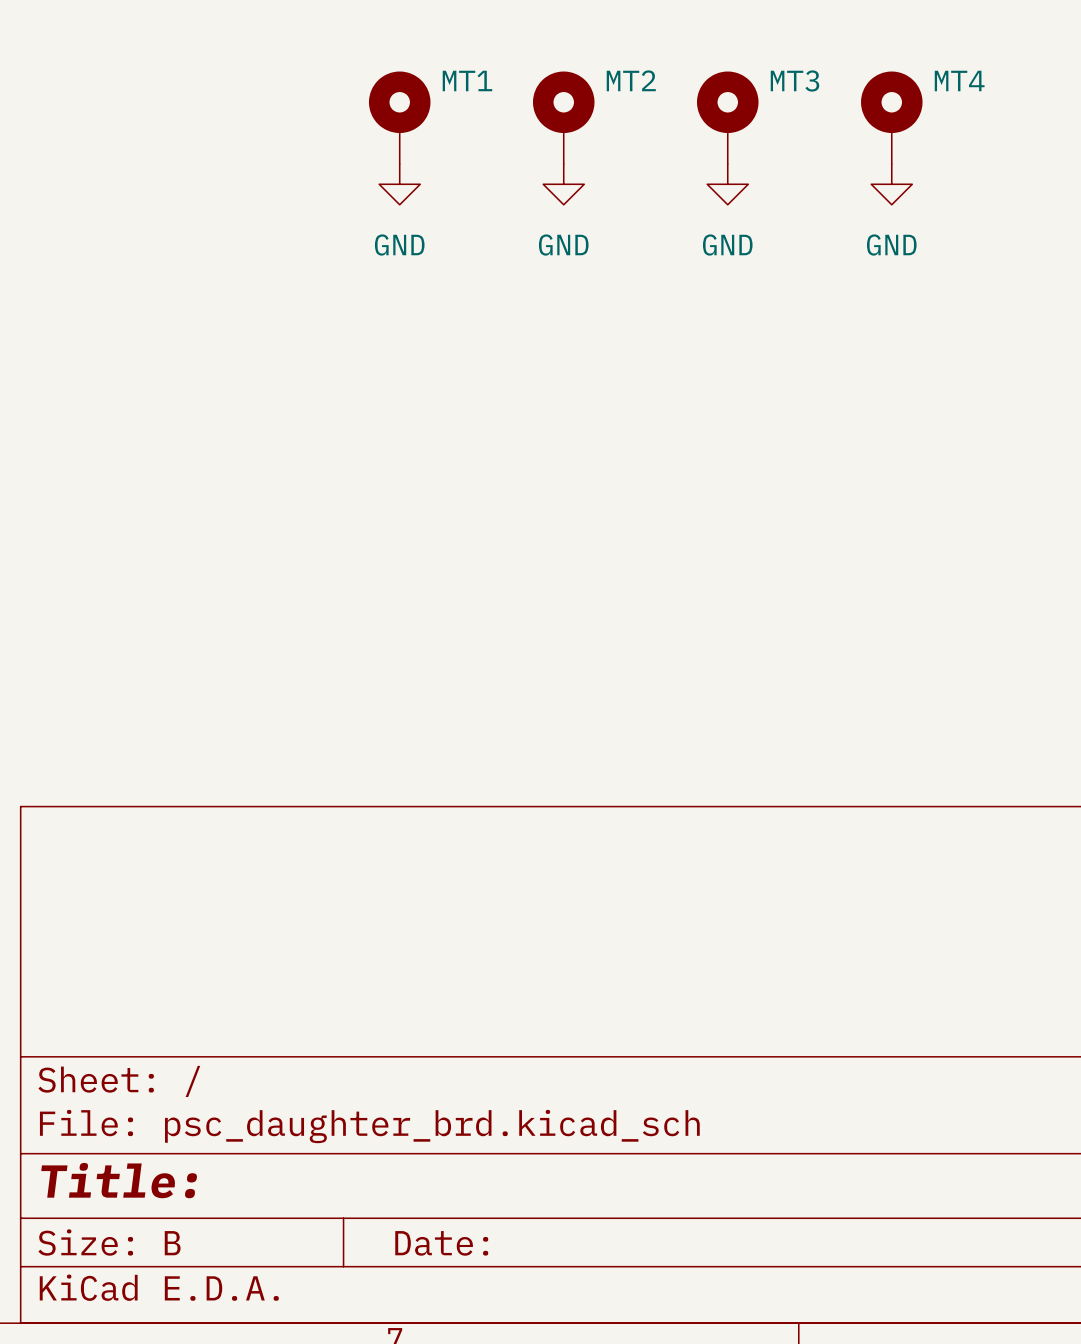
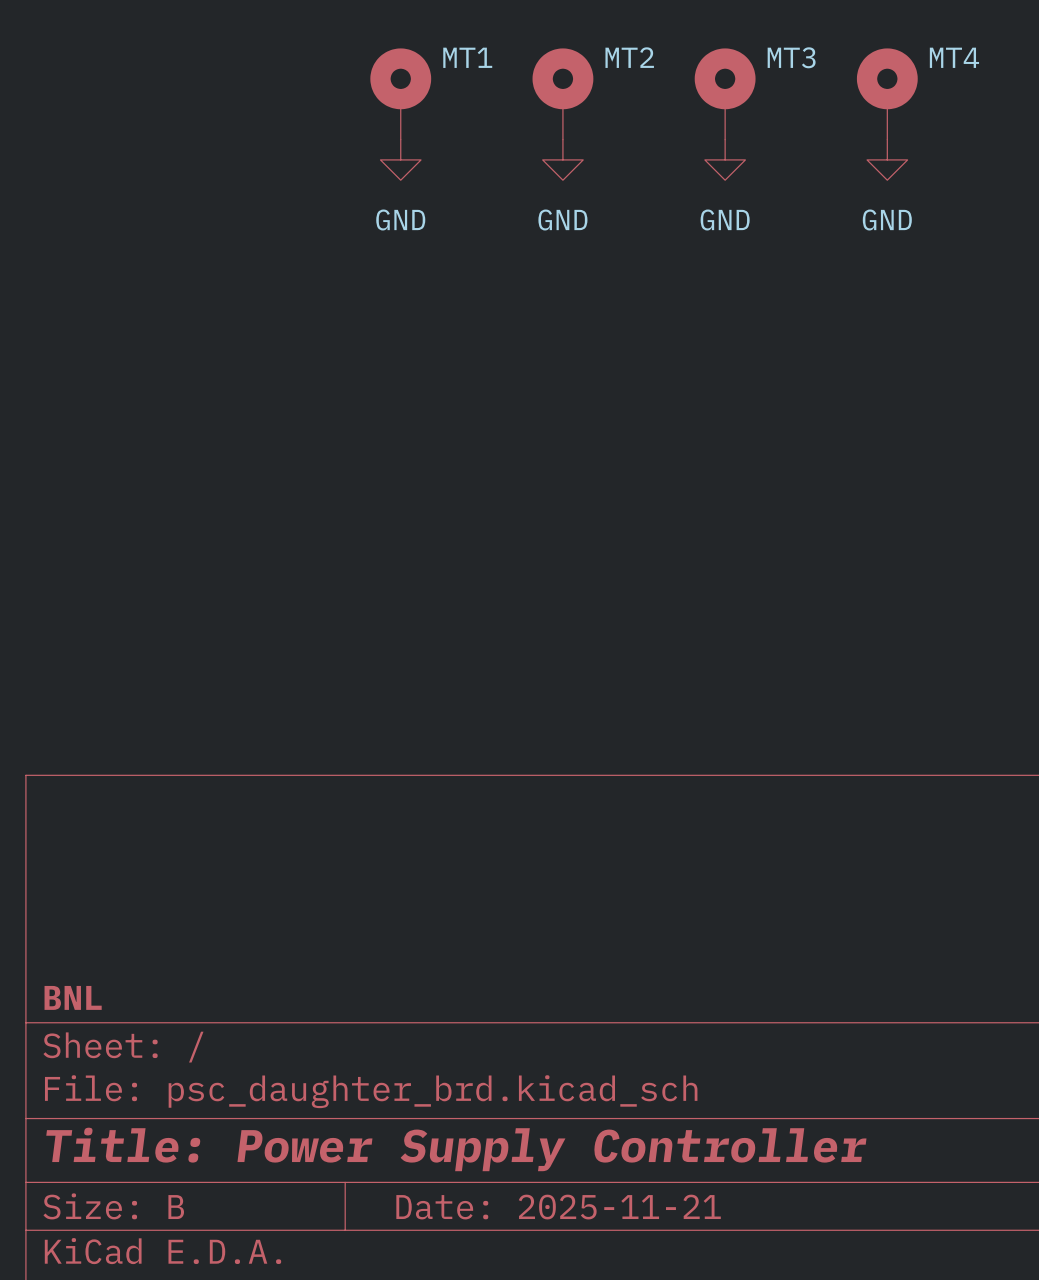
title block: none -> BNL (73, 997)
title block: Title: (119, 1180) -> Title: Power Supply Controller (456, 1149)
title block: Date: (441, 1243) -> Date: 2025-11-21 (558, 1207)

